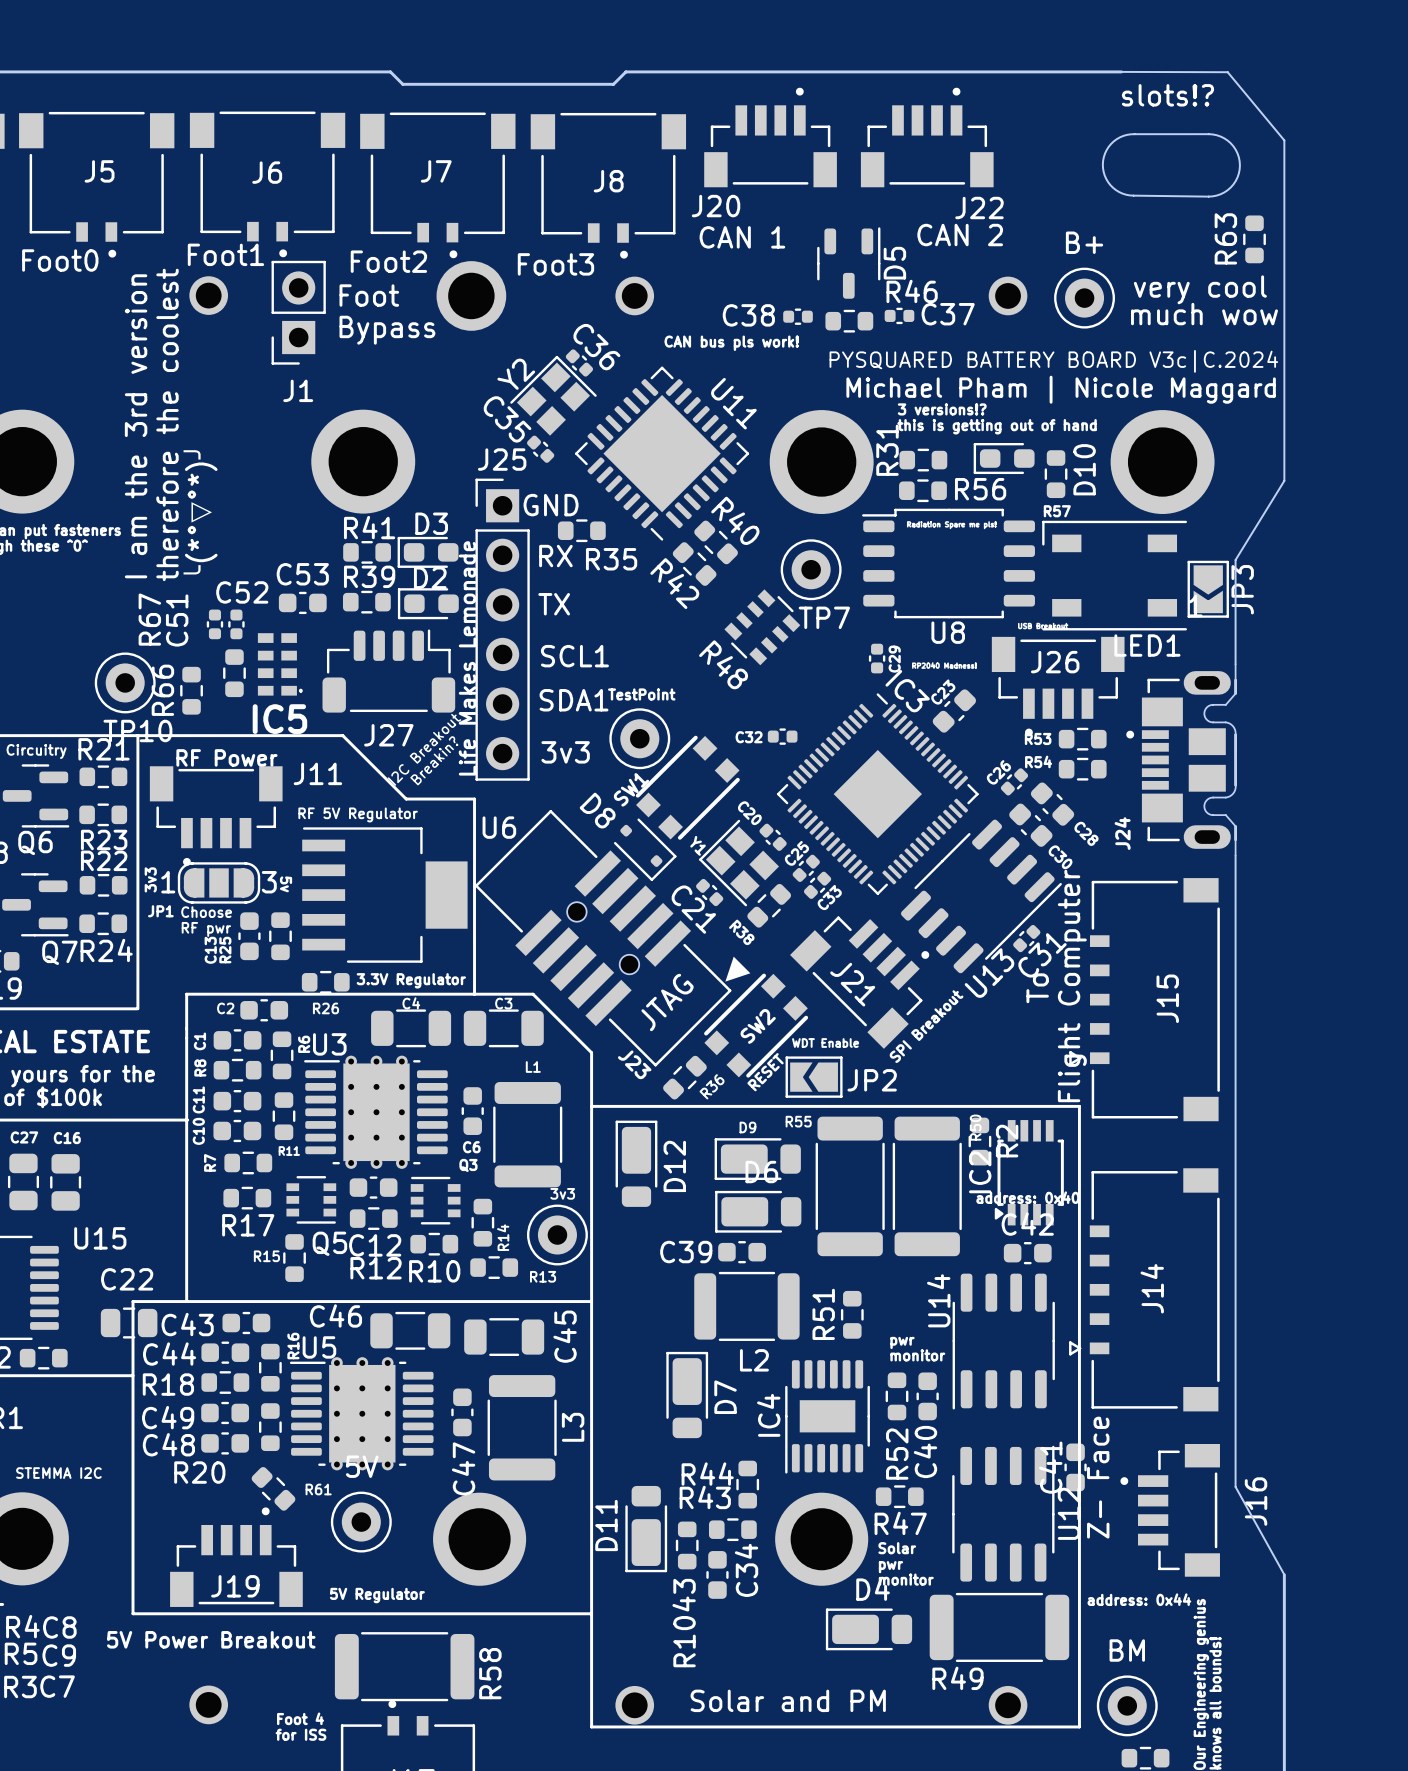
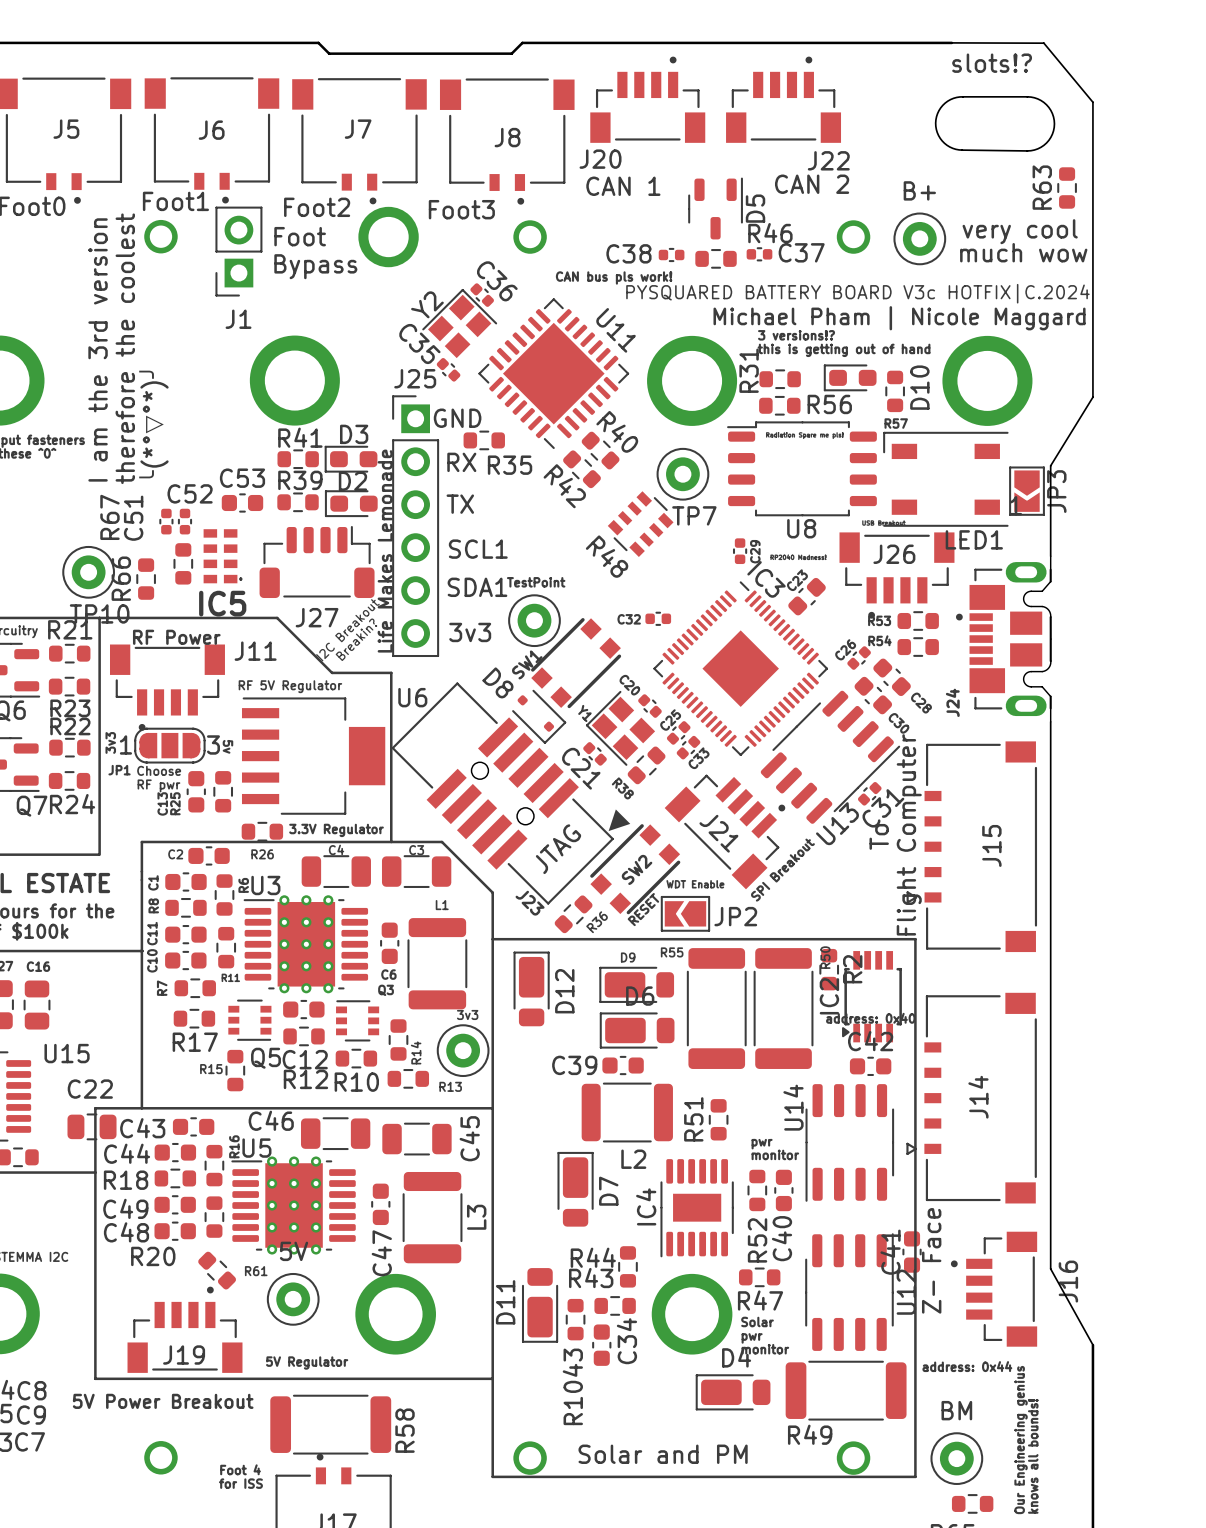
text: PYSQUARED BATTERY BOARD V3c|C.2024 (1053, 361) -> PYSQUARED BATTERY BOARD V3c HOTFIX|C.2024 (857, 293)

